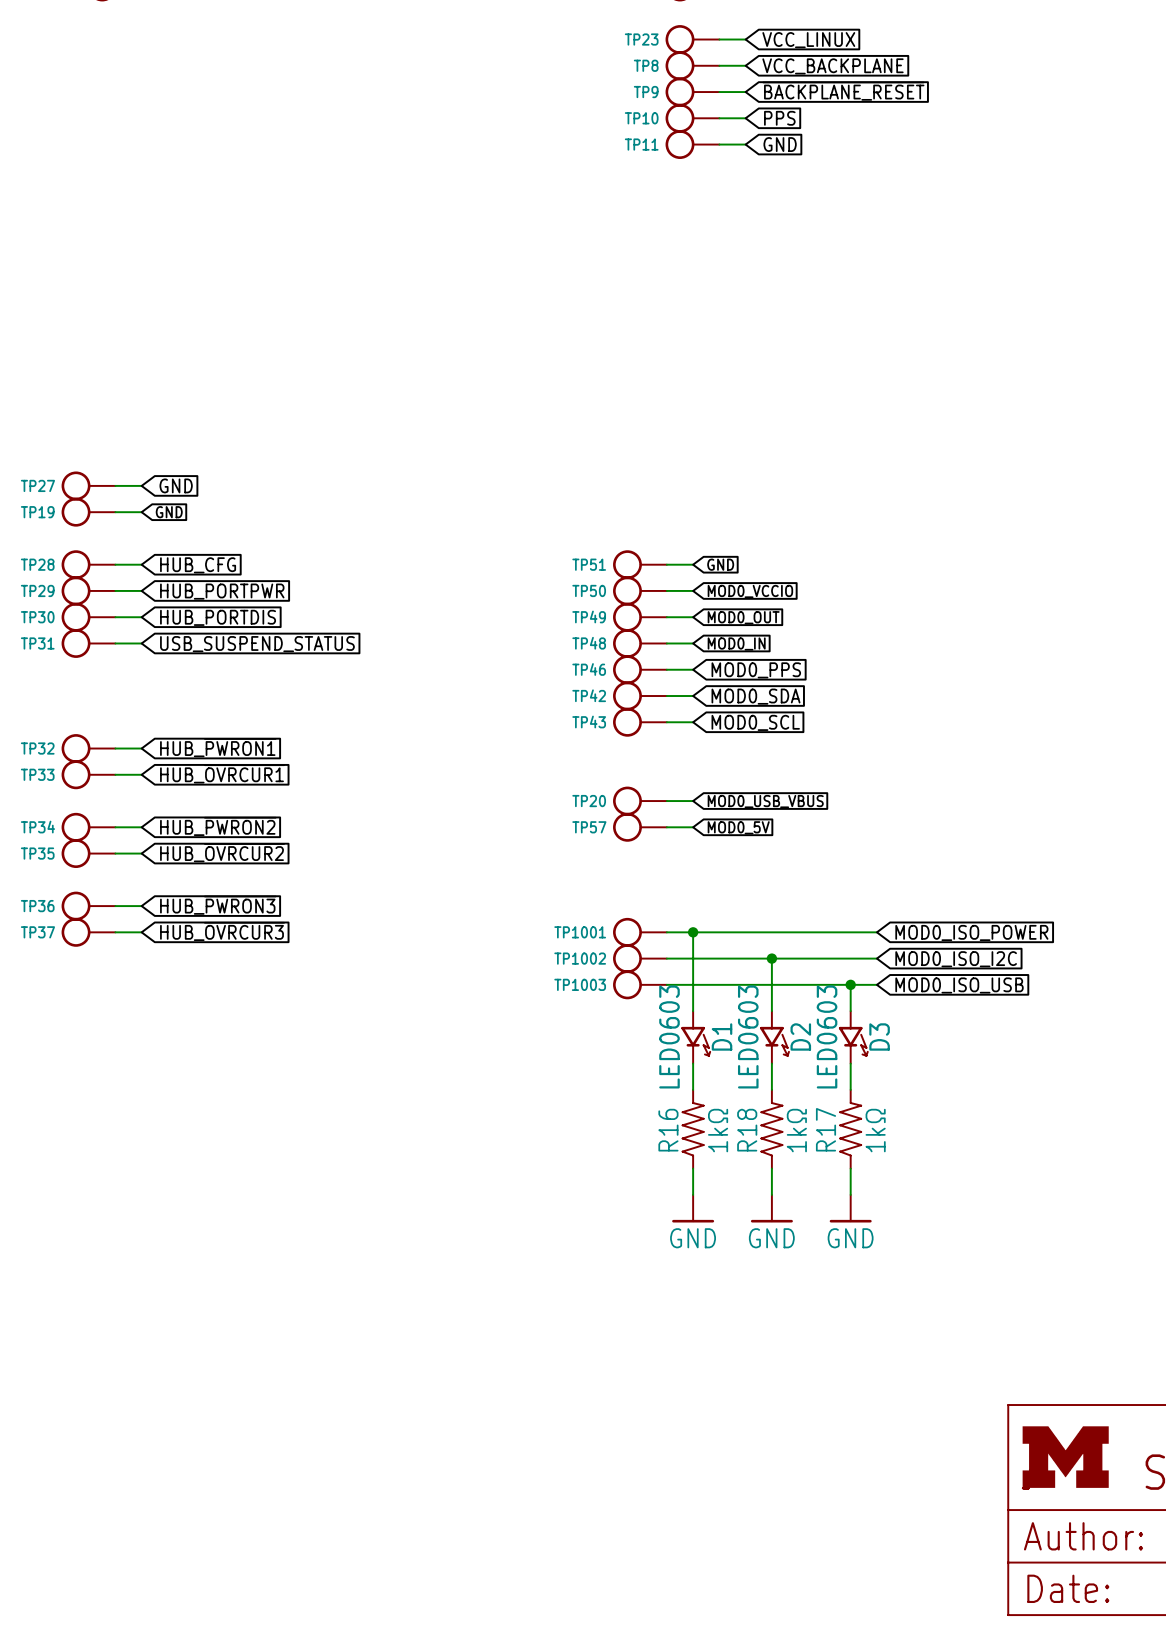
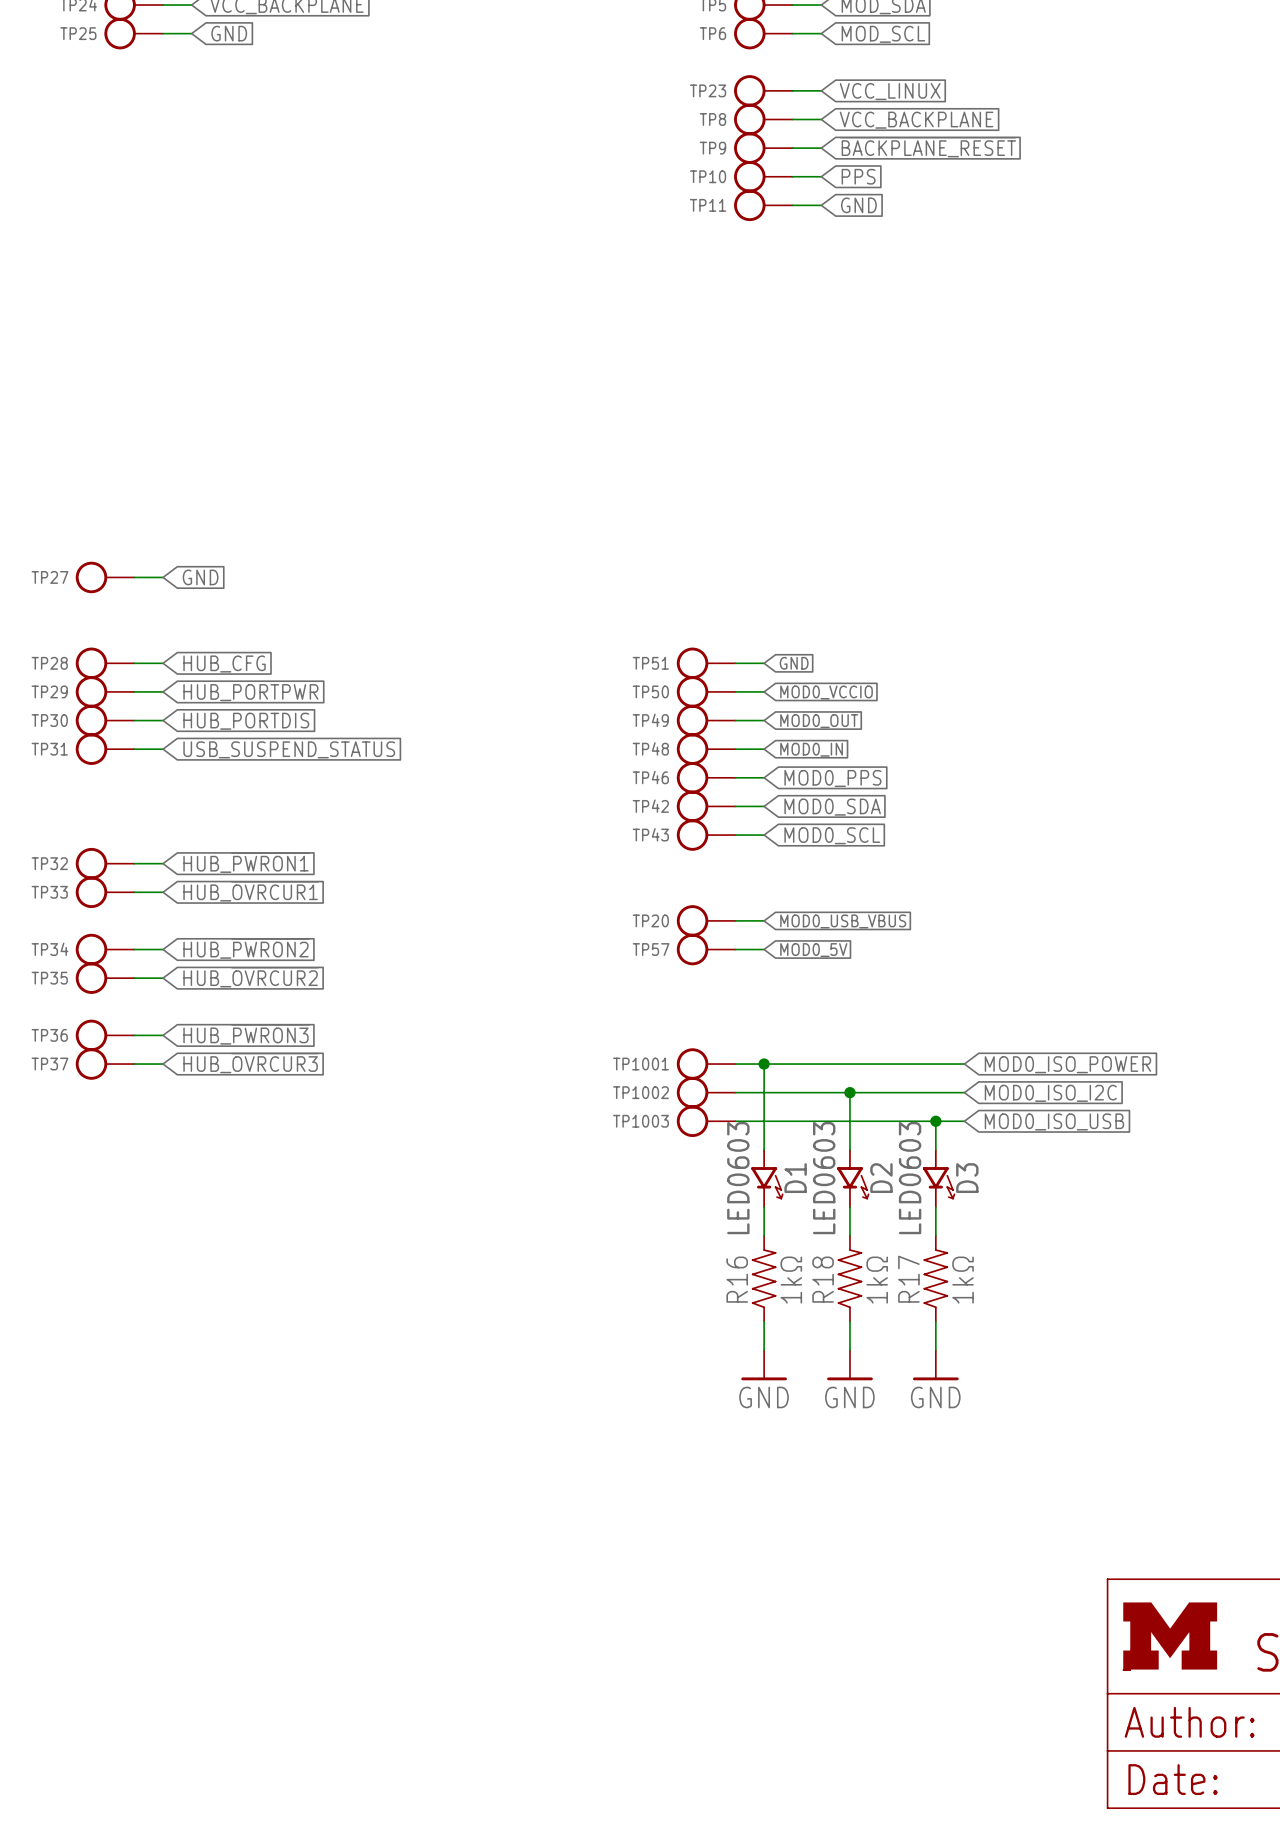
TP19: (88, 512) -> none
wire: (115, 512) (141, 512) -> none
global label: GND (169, 512) -> none

